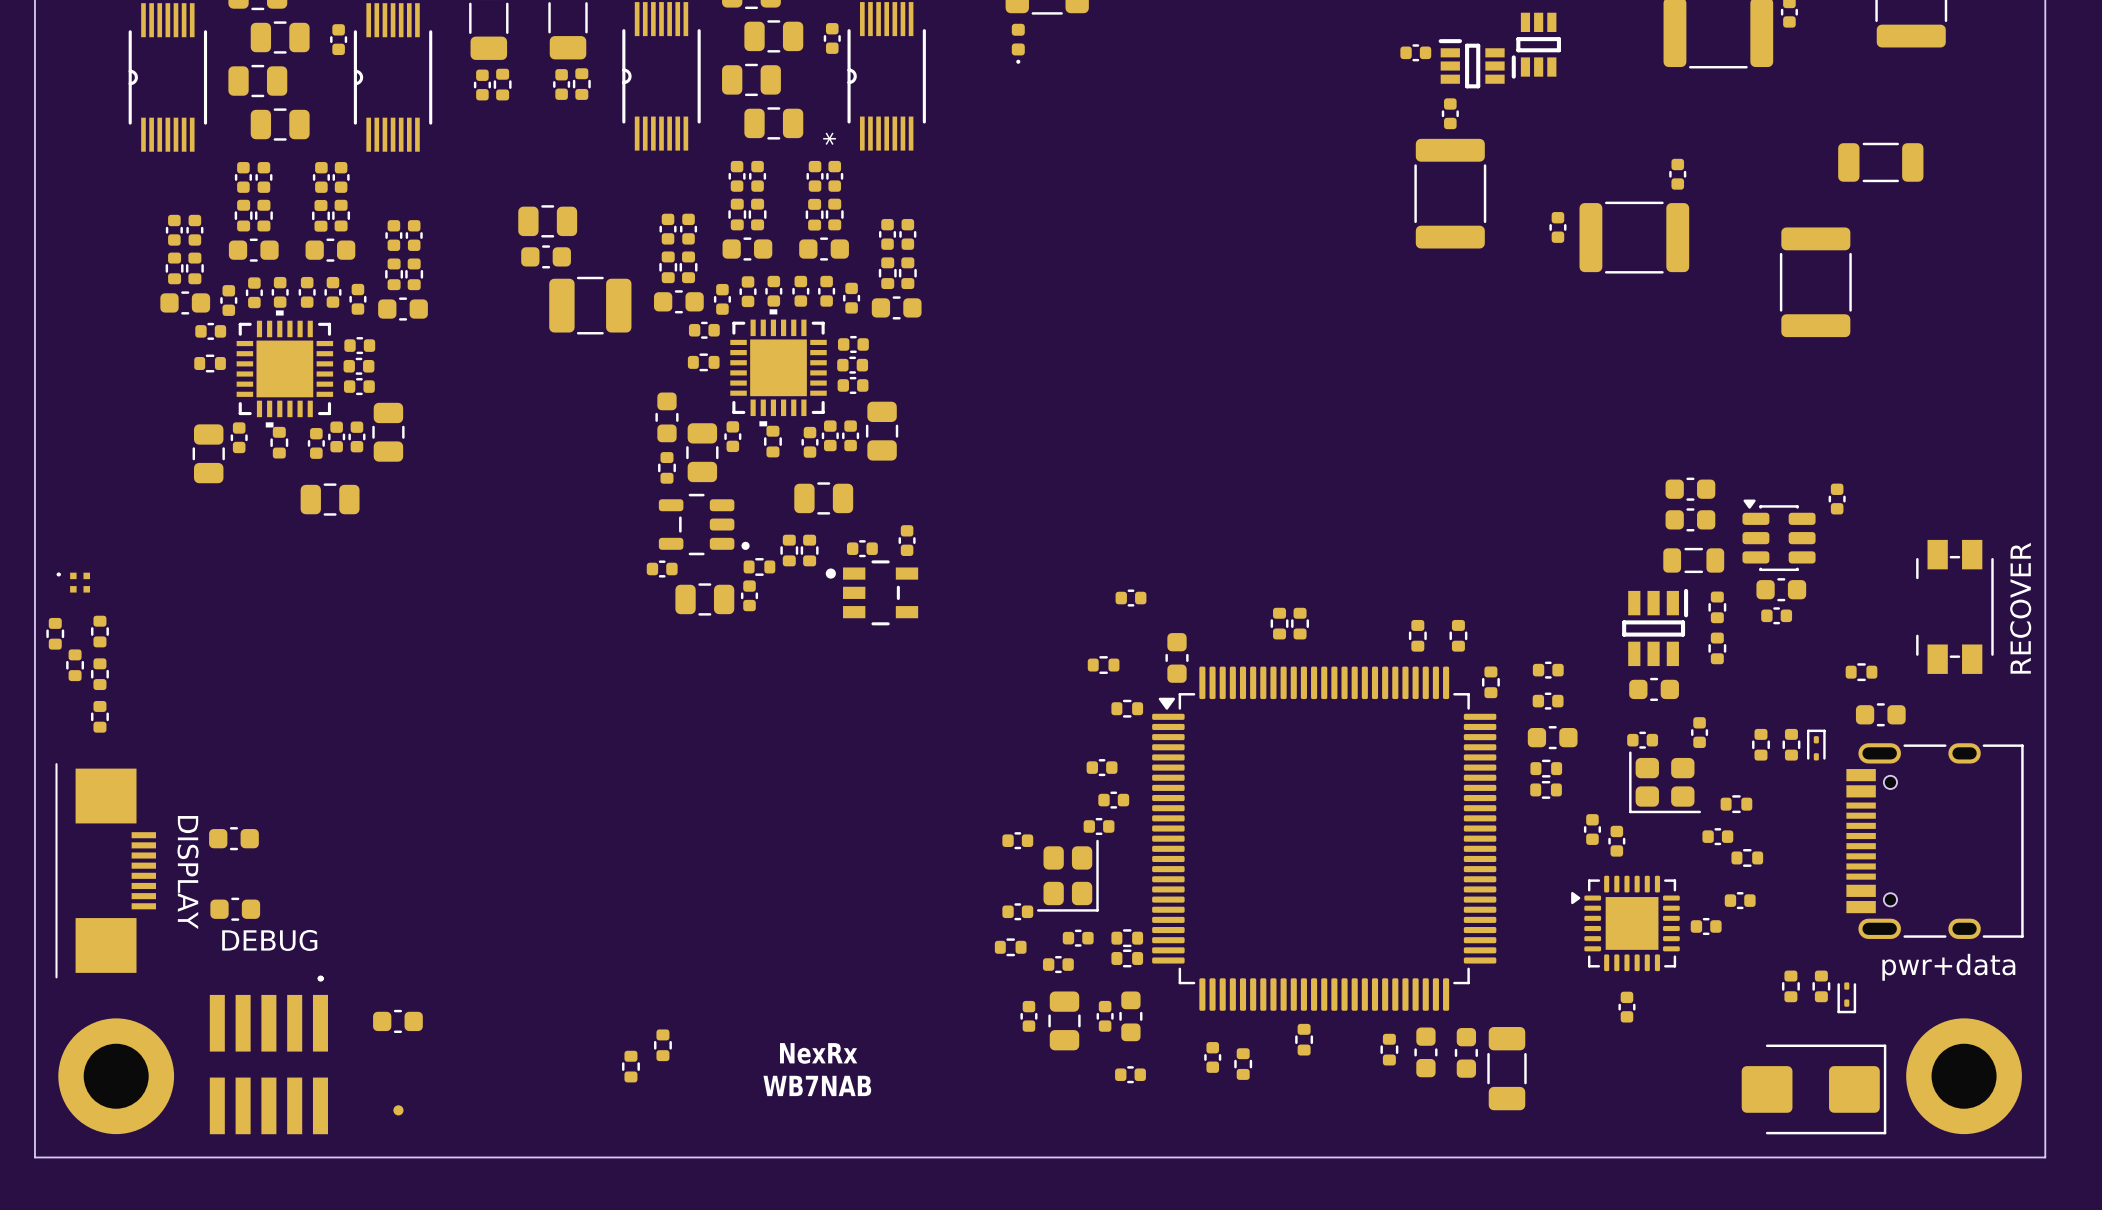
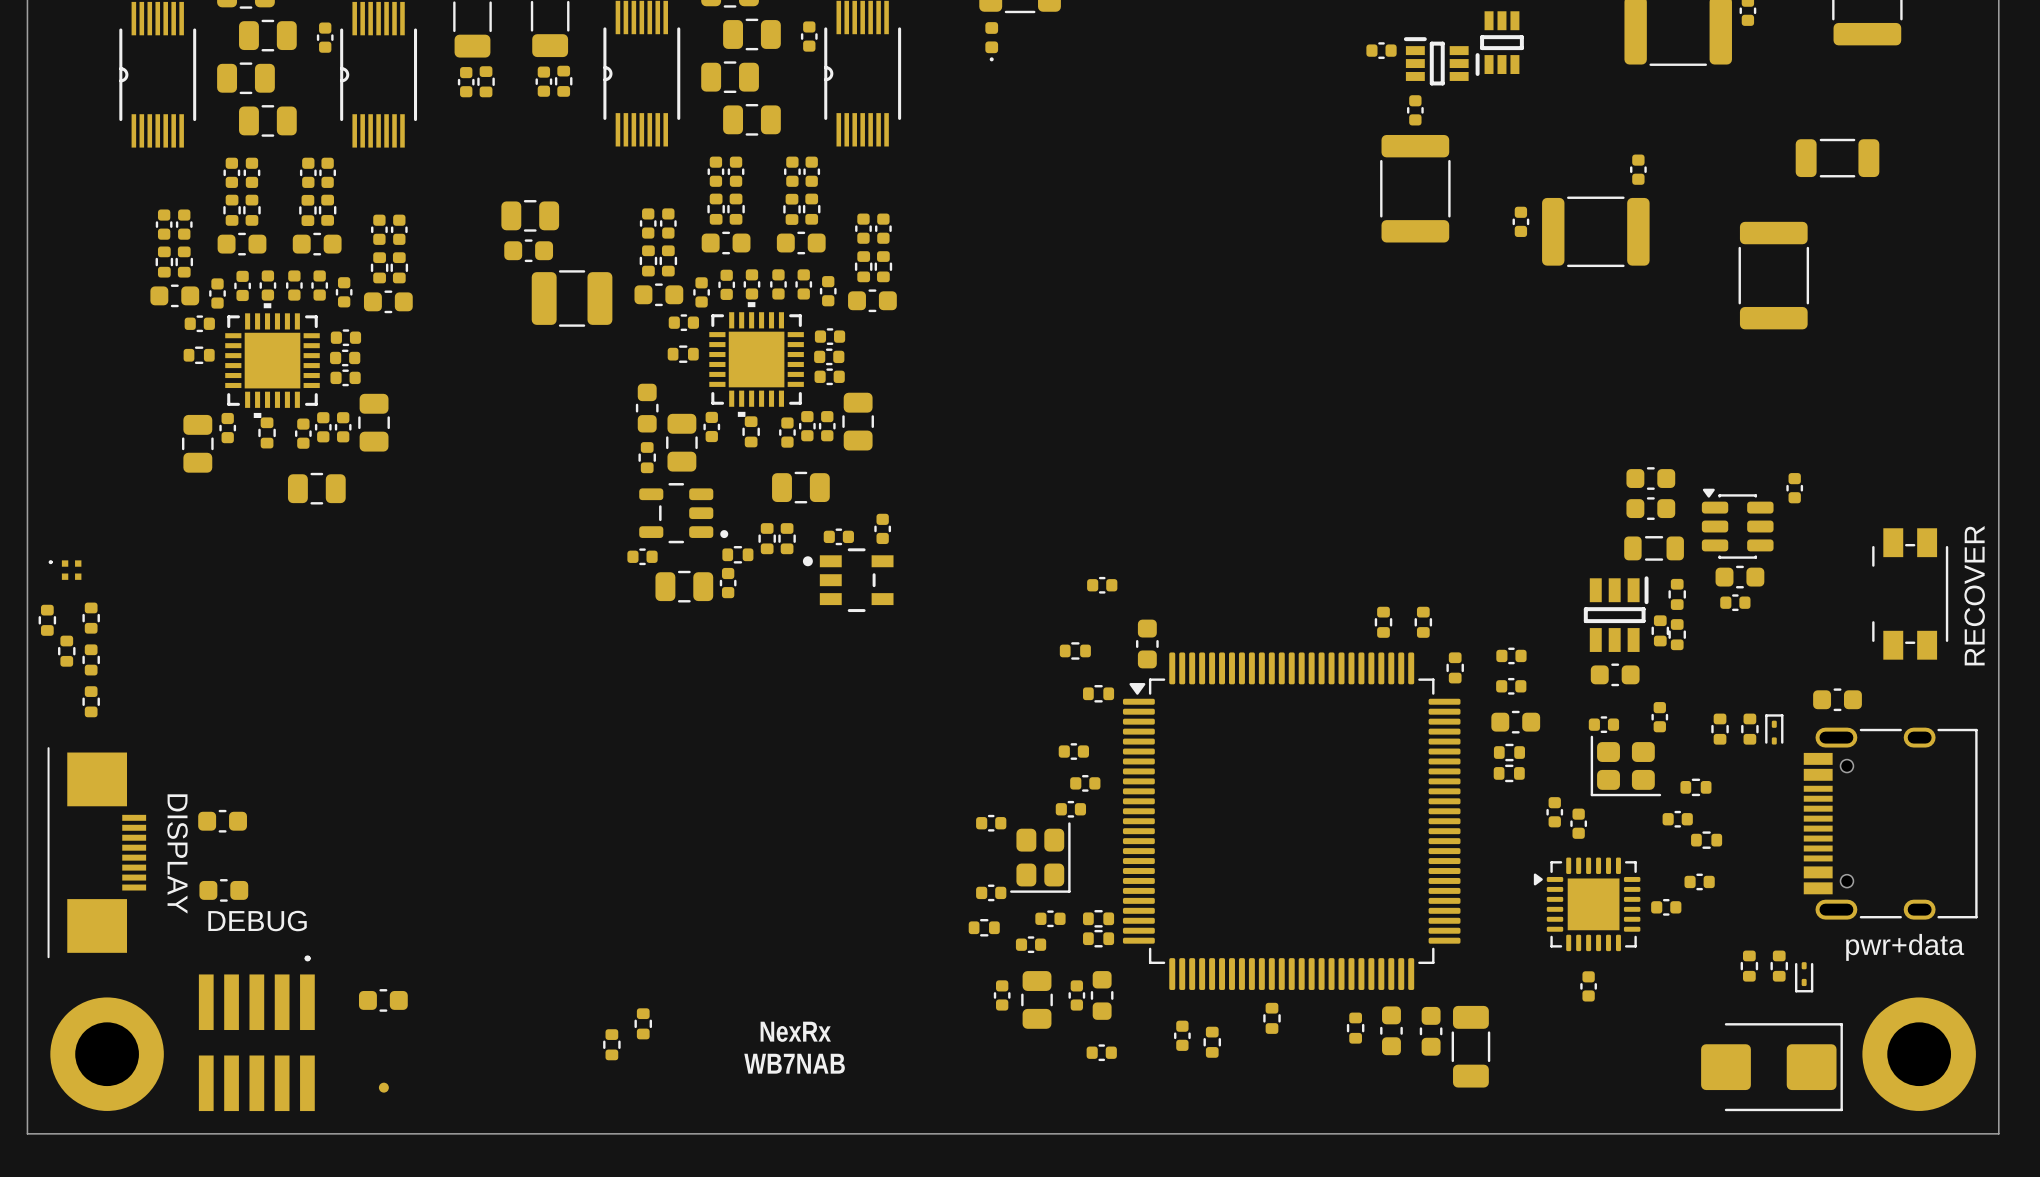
part text: * (829, 138) -> none
part: (1279, 623) -> none
part: (1300, 623) -> none
part rotation: 0° (1861, 672) -> 90° clockwise (1660, 630)
part position: (1861, 672) -> (1660, 630)

